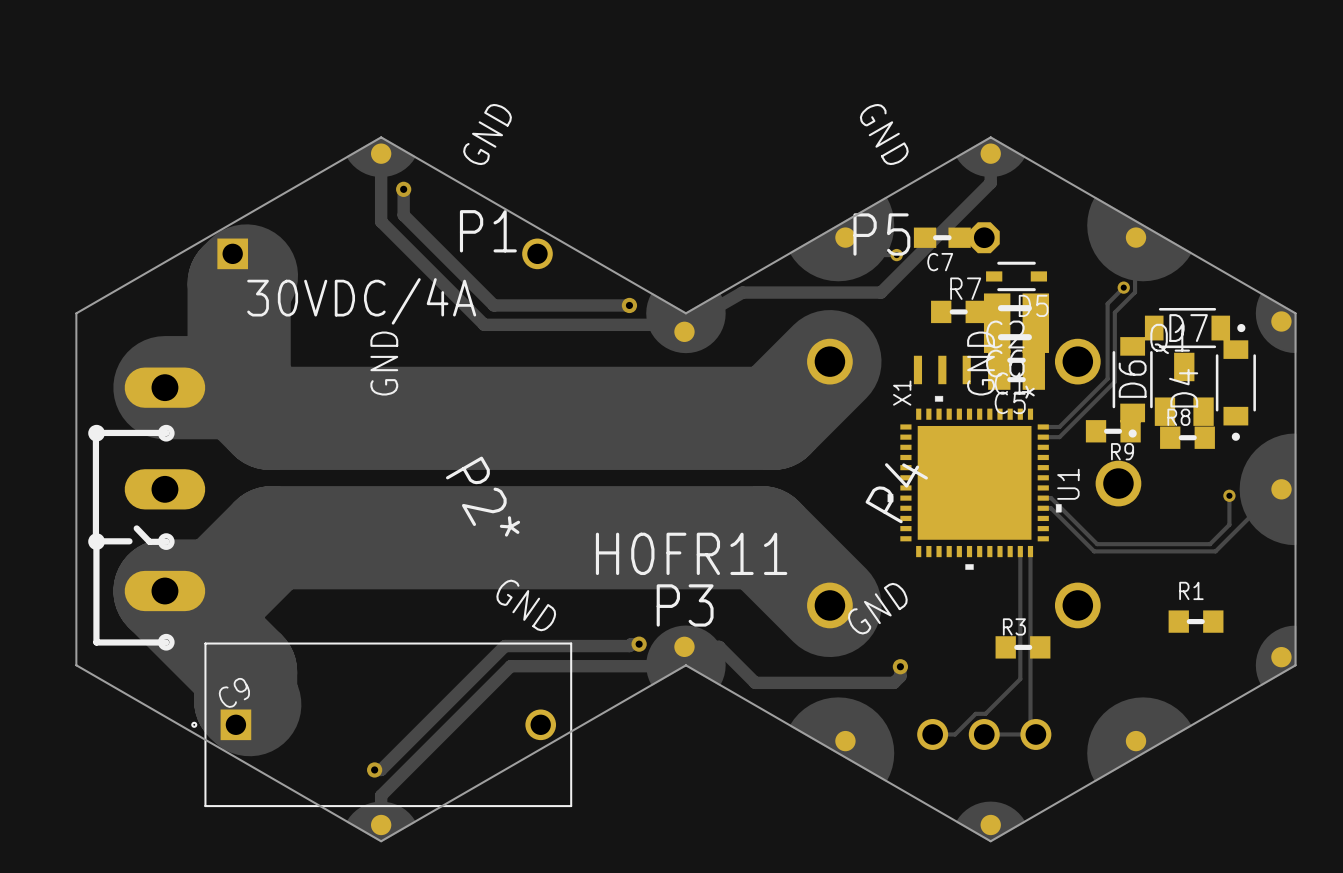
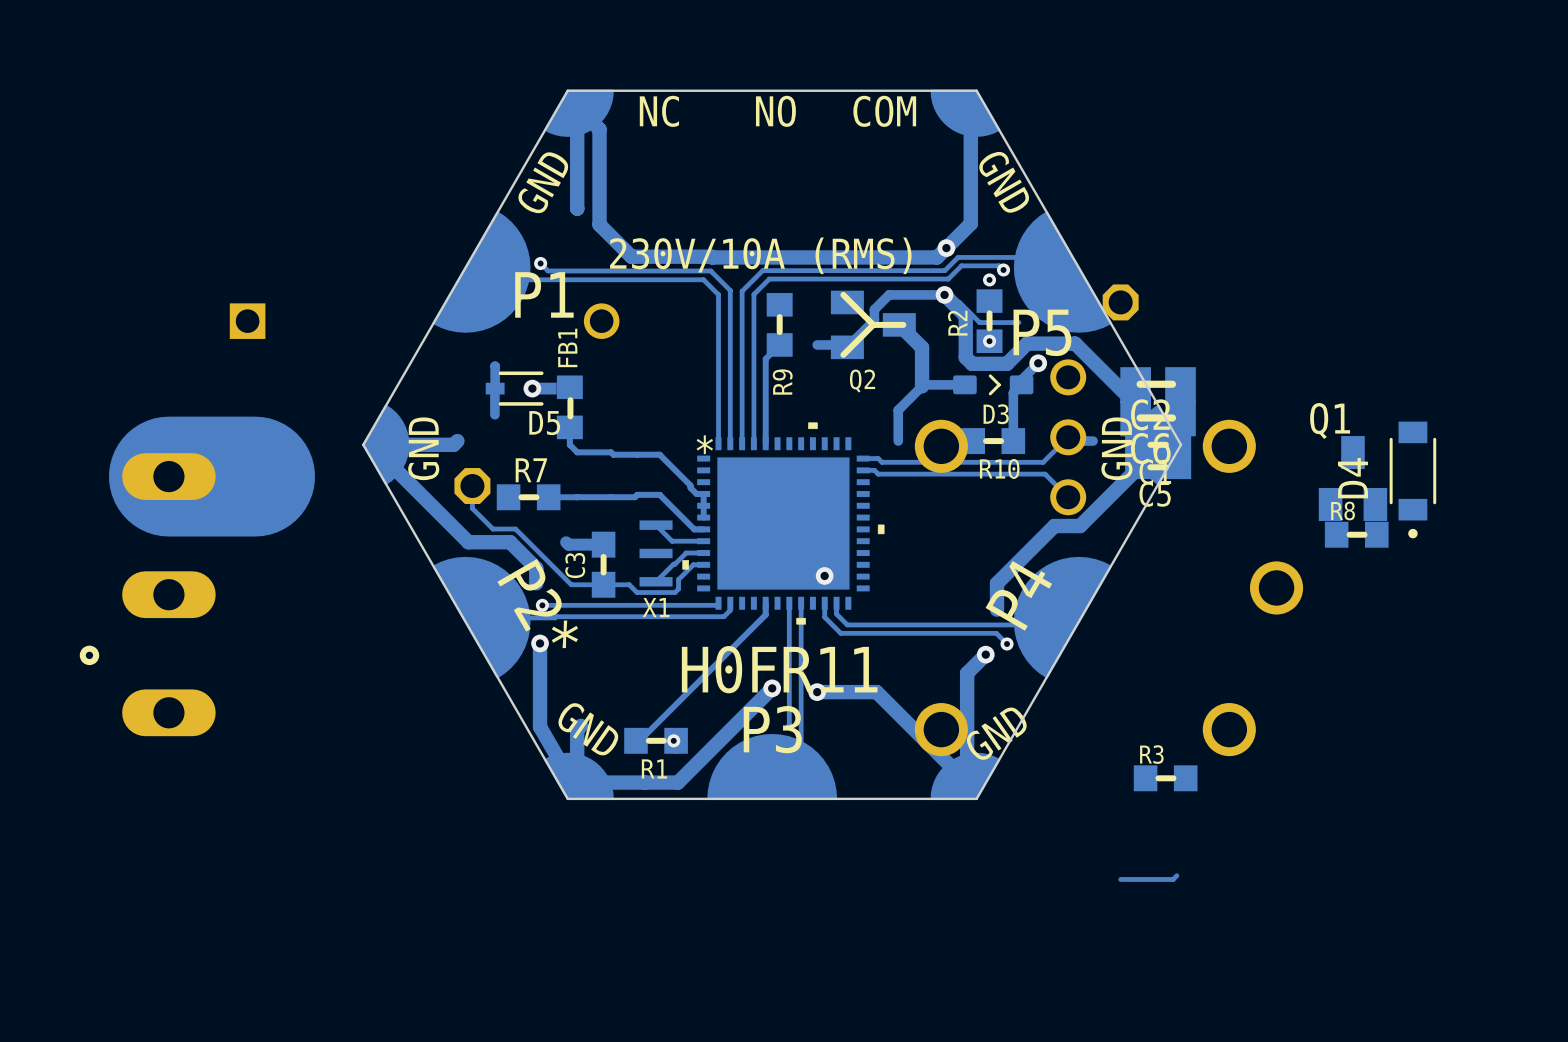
track: none -> (967, 107) (970, 110) (970, 223) (937, 257) (631, 256) (599, 224) (599, 129) (577, 107) (577, 208)
text: none -> NC (659, 111)
text: none -> NO (775, 111)
text: none -> COM (884, 111)
track: (381, 153) (381, 221) (484, 324) (690, 324) -> none
track: (990, 153) (990, 182) (881, 292) (742, 292) (698, 318) (684, 331) -> none
track: (403, 189) (403, 215) (493, 305) (629, 305) -> none
via: (403, 189) -> none
via: none -> (946, 248)
text: none -> 230V/10A (RMS) (760, 255)
track: none -> (540, 263) (548, 270) (710, 270) (730, 290) (730, 443)
via: none -> (540, 263)
track: none -> (1003, 270) (999, 265) (961, 265) (948, 279) (769, 279) (753, 294) (753, 443)
via: none -> (1003, 270)
track: none -> (479, 276) (483, 279) (703, 279) (718, 294) (718, 443)
track: none -> (1064, 276) (1046, 257) (958, 257) (944, 270) (762, 270) (742, 291) (742, 443)
via: none -> (989, 279)
via: none -> (944, 294)
text position: P5 (881, 234) -> P5 (1042, 332)
C7: (942, 237) -> none
track: (1136, 237) (1135, 292) (1114, 312) (1114, 381) (1059, 437) (1043, 437) -> none
R2: none -> (989, 321)
via: (896, 255) -> none
Q2: none -> (873, 324)
track: none -> (899, 324) (922, 347) (922, 386)
via: none -> (989, 341)
track: none -> (779, 344) (765, 358) (765, 443)
track: none -> (817, 344) (845, 344) (847, 347) (874, 320) (874, 309) (889, 294) (944, 294) (965, 316) (965, 357) (972, 363) (1006, 363) (1027, 343) (1075, 343) (1128, 396) (1128, 414) (1158, 444) (1162, 444)
track: (246, 275) (239, 283) (239, 387) (269, 418) (773, 418) (829, 361) -> none
D5 position: (1016, 276) -> (521, 388)
track: (1123, 287) (1107, 303) (1107, 378) (1059, 426) (1043, 426) -> none
via: (1123, 287) -> none
track: none -> (1038, 363) (1021, 379) (1021, 384) (1013, 393) (1013, 441)
via: none -> (1038, 363)
track: none -> (495, 366) (495, 388)
text: 30VDC/4A (361, 301) -> none
via: (629, 305) -> none
track: none -> (964, 384) (920, 384) (922, 386)
D3: none -> (993, 384)
track: none -> (922, 386) (898, 410) (898, 441)
via: none -> (532, 388)
R7 position: (958, 311) -> (528, 497)
track: none -> (494, 388) (494, 414)
FB1: none -> (569, 407)
D7: (1195, 328) -> none
track: none -> (569, 427) (569, 444) (577, 452) (659, 454) (696, 493) (703, 493) (703, 517)
track: none -> (457, 441) (453, 444) (382, 444) (382, 456) (468, 542) (510, 542) (536, 568) (536, 583)
R10: none -> (993, 441)
track: none -> (1093, 441) (1071, 441) (1068, 437) (1043, 462) (881, 462) (878, 458) (863, 458)
part: none -> (772, 444)
track: none -> (1161, 444) (1080, 526) (1054, 526) (997, 583) (997, 609)
X1 rotation: 0° (942, 369) -> 90° clockwise (656, 553)
X1 position: (942, 369) -> (656, 553)
track: none -> (863, 470) (874, 470) (878, 474) (1045, 474) (1068, 497)
D6: (1132, 387) -> none
X1 name position: X1 (902, 393) -> X1 (656, 607)
track: none -> (472, 486) (472, 508) (492, 529) (515, 529) (571, 584) (629, 584) (637, 592) (675, 592) (678, 589) (678, 579) (693, 564) (703, 564)
part: none -> (472, 486)
track: none -> (548, 497) (634, 497) (637, 494) (659, 494) (694, 529) (703, 529)
drawing: [88, 424, 105, 442] -> none
drawing: [157, 424, 175, 442] -> none
part: none -> (783, 523)
track: none -> (656, 525) (672, 541) (703, 541)
R9 rotation: 0° (1113, 431) -> 90° clockwise (779, 324)
R9 position: (1113, 431) -> (779, 324)
line: (166, 432) (95, 432) (95, 540) -> none
track: none -> (566, 542) (568, 544) (603, 544)
track: none -> (703, 553) (686, 553) (656, 581)
C3: none -> (603, 564)
via: none -> (824, 575)
U1: (974, 482) -> none
part: (685, 489) -> none
track: (1281, 489) (1277, 489) (1215, 551) (1094, 551) (1051, 508) (1043, 508) -> none
track: (1229, 495) (1229, 524) (1210, 544) (1097, 544) (1051, 498) (1043, 498) -> none
via: (1229, 495) -> none
track: none -> (718, 603) (716, 605) (542, 605)
track: none -> (730, 603) (730, 610) (723, 616) (484, 617) (479, 613)
track: none -> (765, 603) (765, 614) (639, 740) (635, 740)
track: none -> (789, 603) (788, 725)
track: none -> (801, 603) (801, 753) (772, 782)
track: none -> (824, 603) (824, 617) (840, 633) (996, 633) (1007, 644)
track: none -> (836, 603) (836, 614) (847, 624) (1028, 624) (1035, 632) (1046, 632) (1064, 613)
via: none -> (542, 605)
line: (136, 528) (149, 541) (166, 541) -> none
track: none -> (540, 643) (540, 726) (565, 770) (577, 782)
via: none -> (540, 643)
via: none -> (1007, 644)
drawing: [157, 533, 175, 550] -> none
track: none -> (985, 654) (967, 673) (967, 782) (876, 692) (817, 692)
via: none -> (985, 654)
line: (96, 541) (96, 642) (166, 642) -> none
line: (129, 541) (95, 541) -> none
track: (1020, 551) (1020, 679) (985, 713) (975, 713) (955, 734) (932, 734) -> none
track: (1030, 551) (1030, 729) (1035, 734) -> none
track: none -> (772, 688) (677, 782) (577, 782)
via: none -> (772, 688)
via: none -> (817, 692)
track: none -> (581, 725) (577, 729) (577, 782)
track: (829, 605) (762, 537) (271, 537) (218, 591) (164, 591) (245, 671) (245, 700) (249, 704) -> none
via: none -> (673, 740)
R1 rotation: 0° (1196, 621) -> 180° (656, 740)
R1 position: (1196, 621) -> (656, 740)
drawing: [157, 633, 175, 651] -> none
track: (639, 644) (629, 646) (504, 646) (381, 769) (374, 769) -> none
via: (639, 644) -> none
track: (900, 666) (900, 676) (893, 682) (755, 682) (719, 646) (684, 646) (665, 666) (510, 666) (381, 795) (381, 825) -> none
via: (900, 666) -> none
C9: (381, 724) -> none
part rotation: 0° (984, 734) -> 90° clockwise (1068, 437)
part position: (984, 734) -> (1068, 437)
via: (374, 769) -> none

